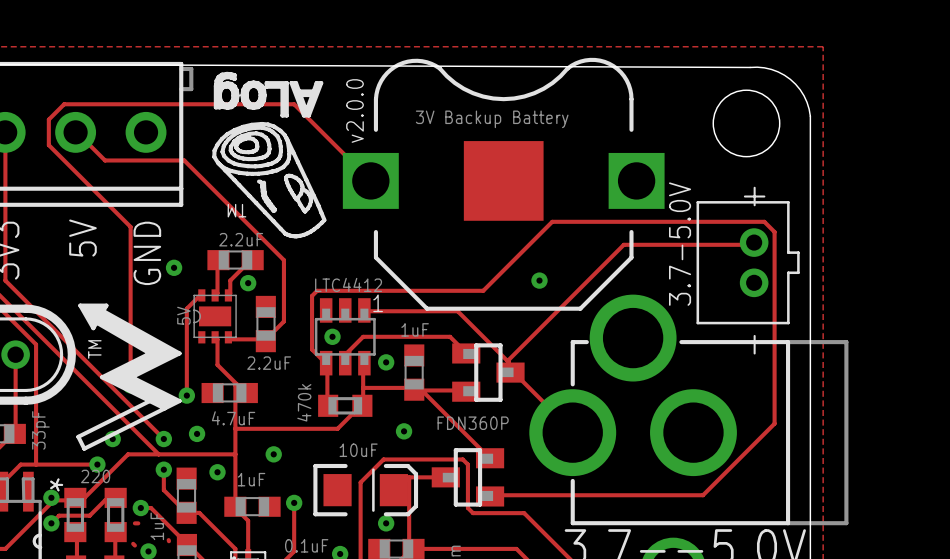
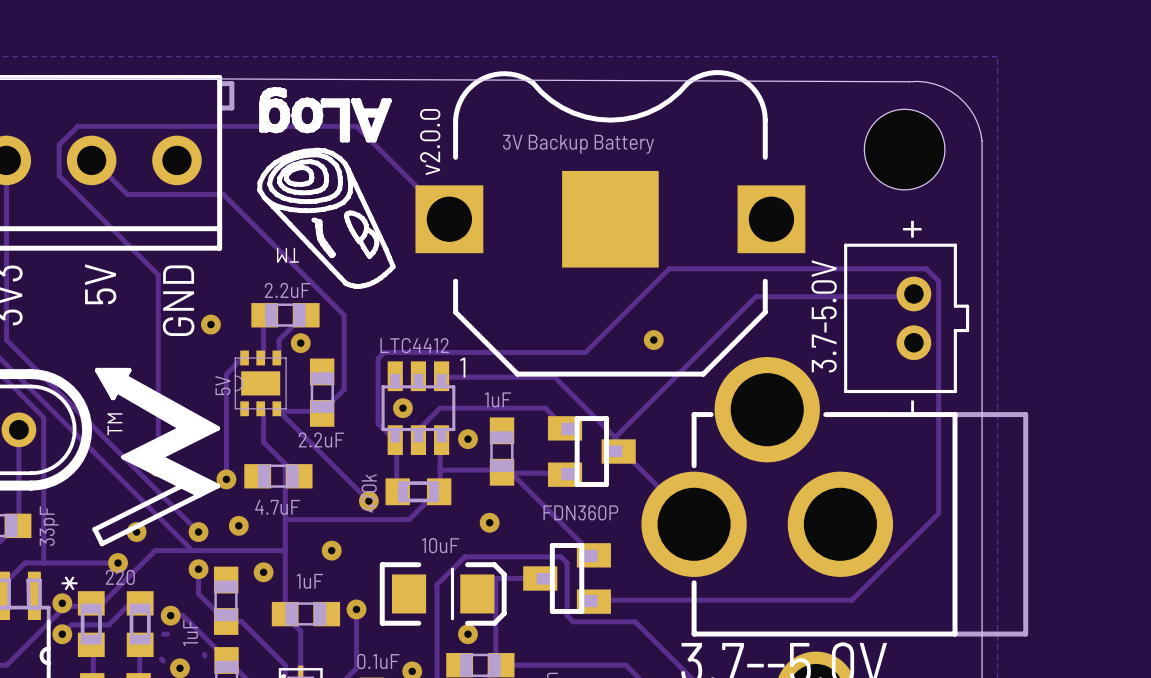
track: none -> (279, 411) (368, 501)
via: none -> (368, 501)

